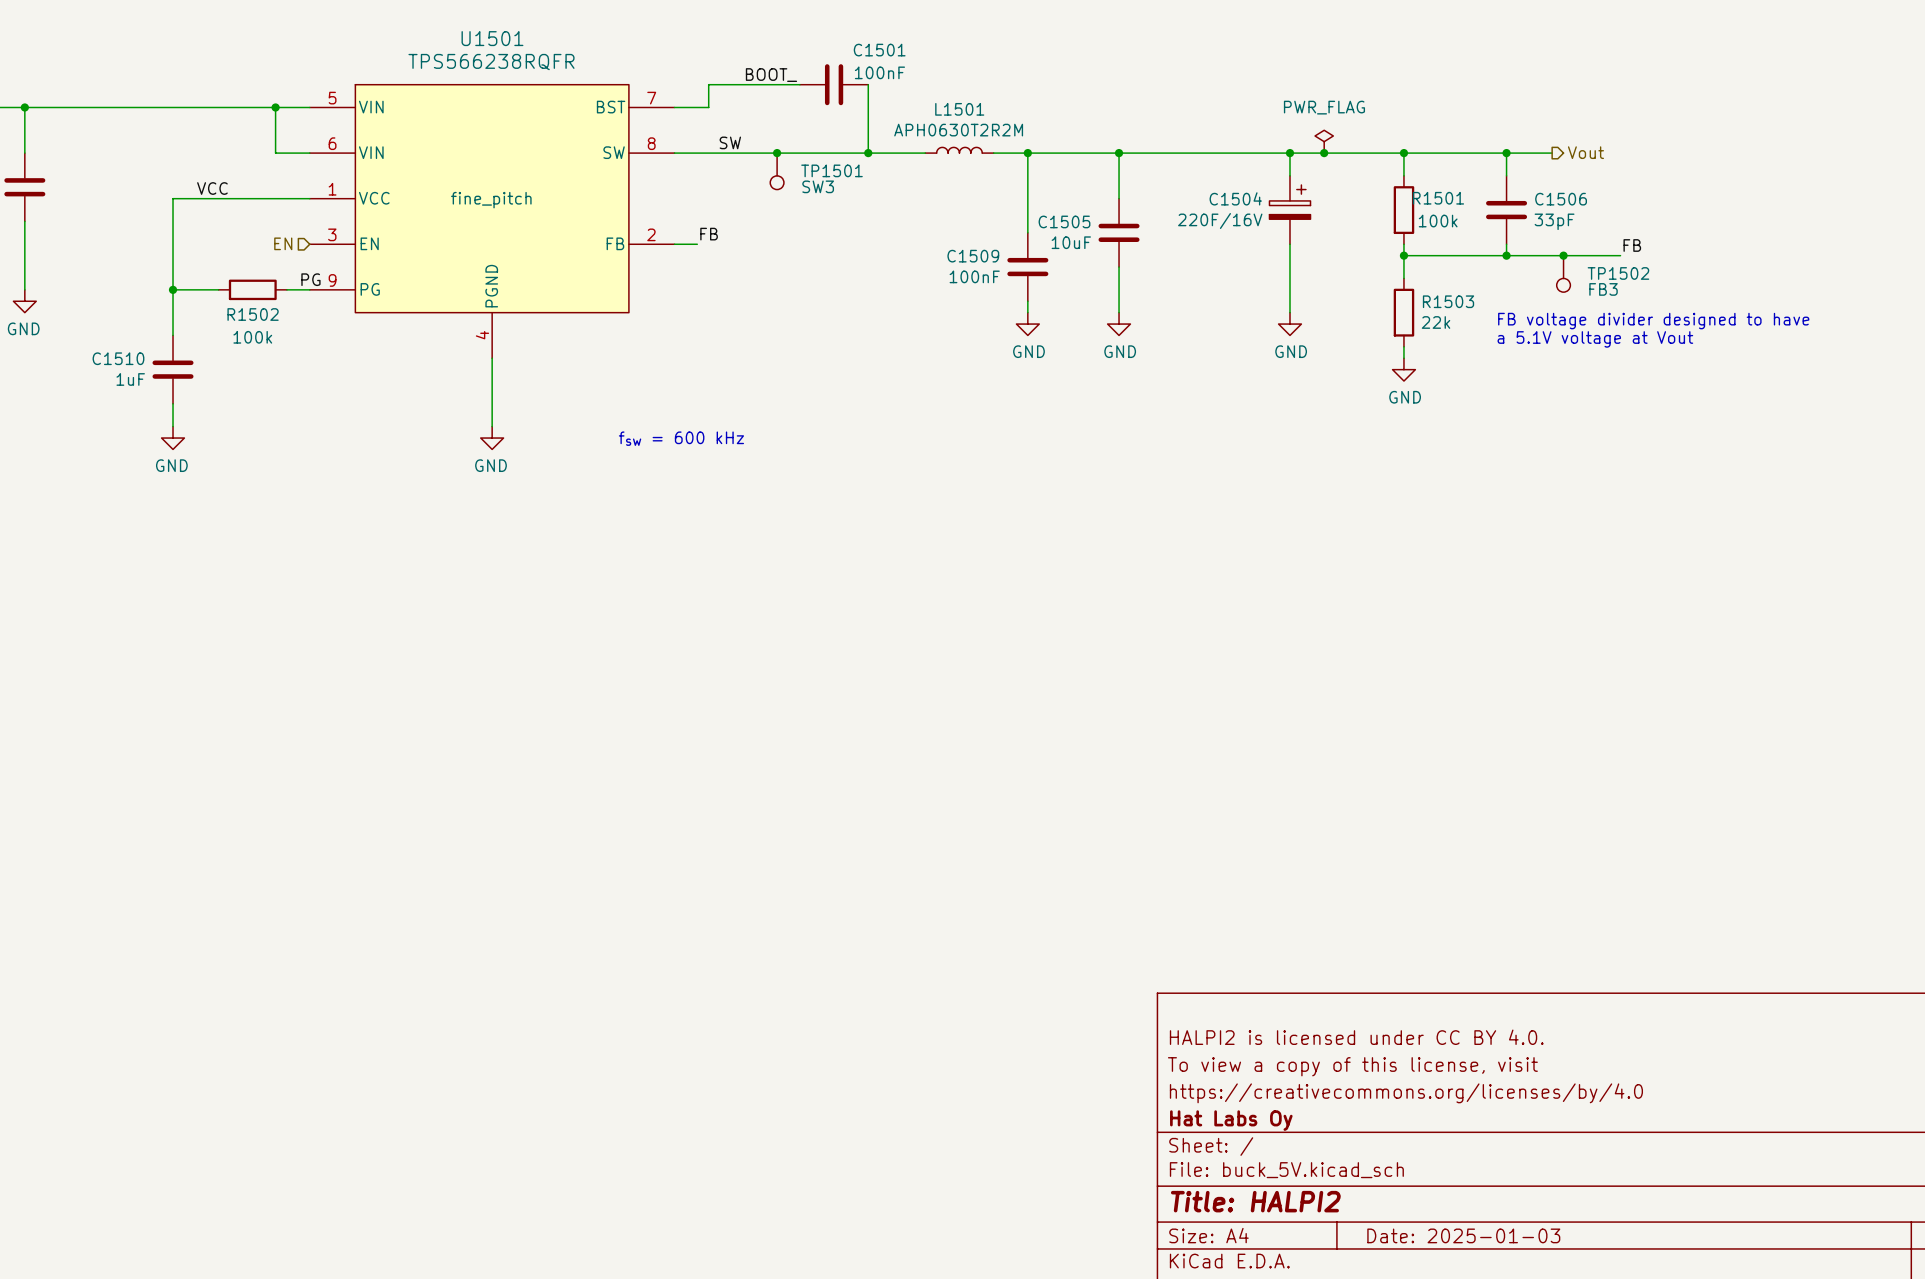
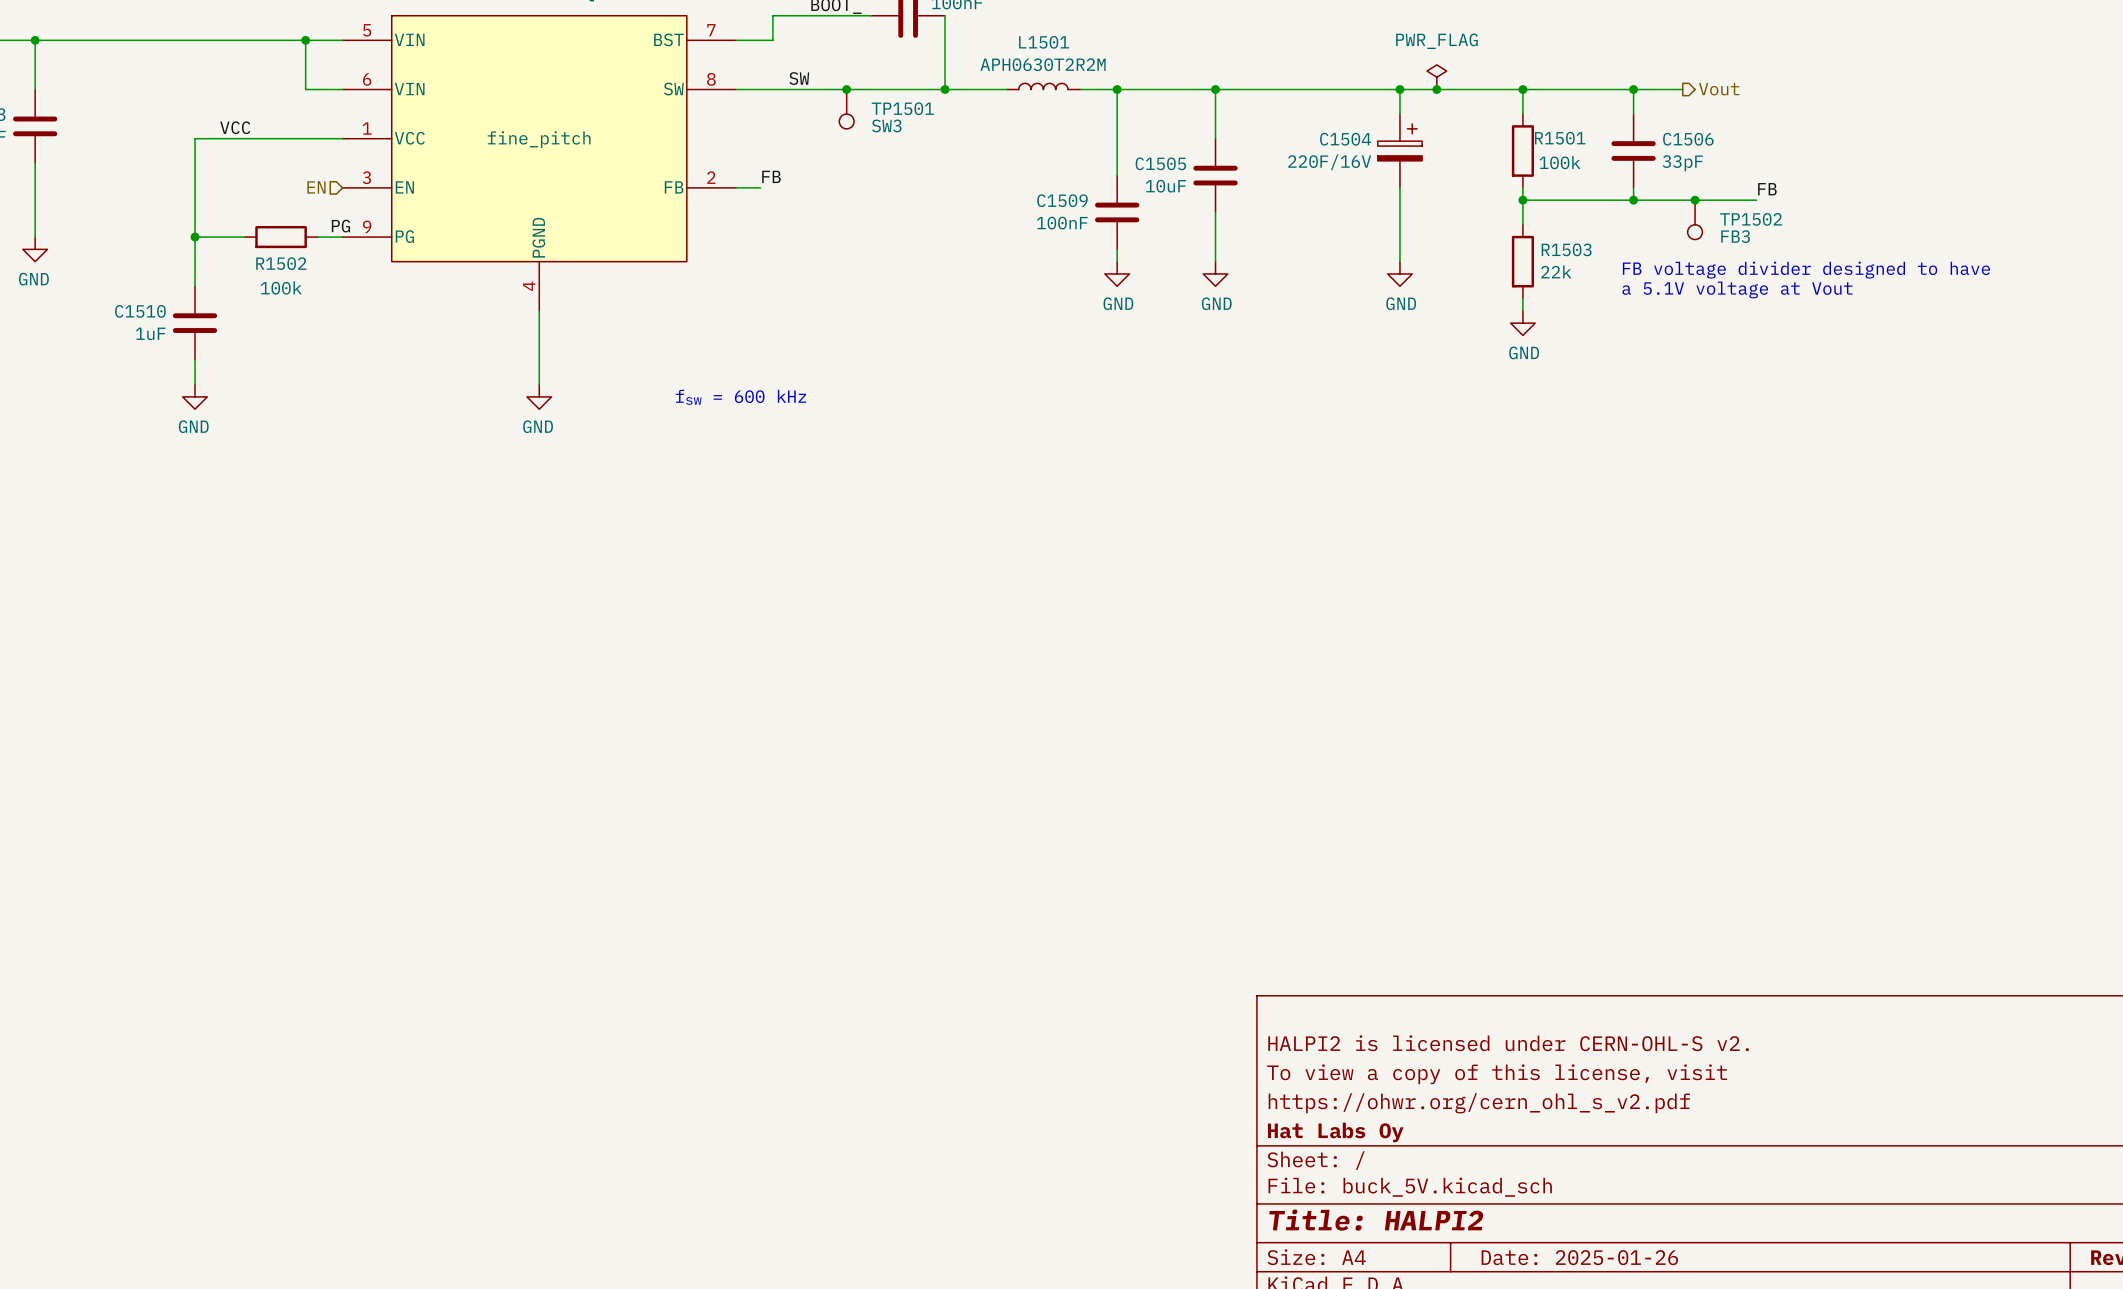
title block: HALPI2 is licensed under CC BY 4.0. (1356, 1037) -> HALPI2 is licensed under CERN-OHL-S v2. (1508, 1043)
title block: https://creativecommons.org/licenses/by/4.0 (1406, 1093) -> https://ohwr.org/cern_ohl_s_v2.pdf (1479, 1103)
title block: Date: 2025-01-03 (1463, 1235) -> Date: 2025-01-26 (1579, 1257)

